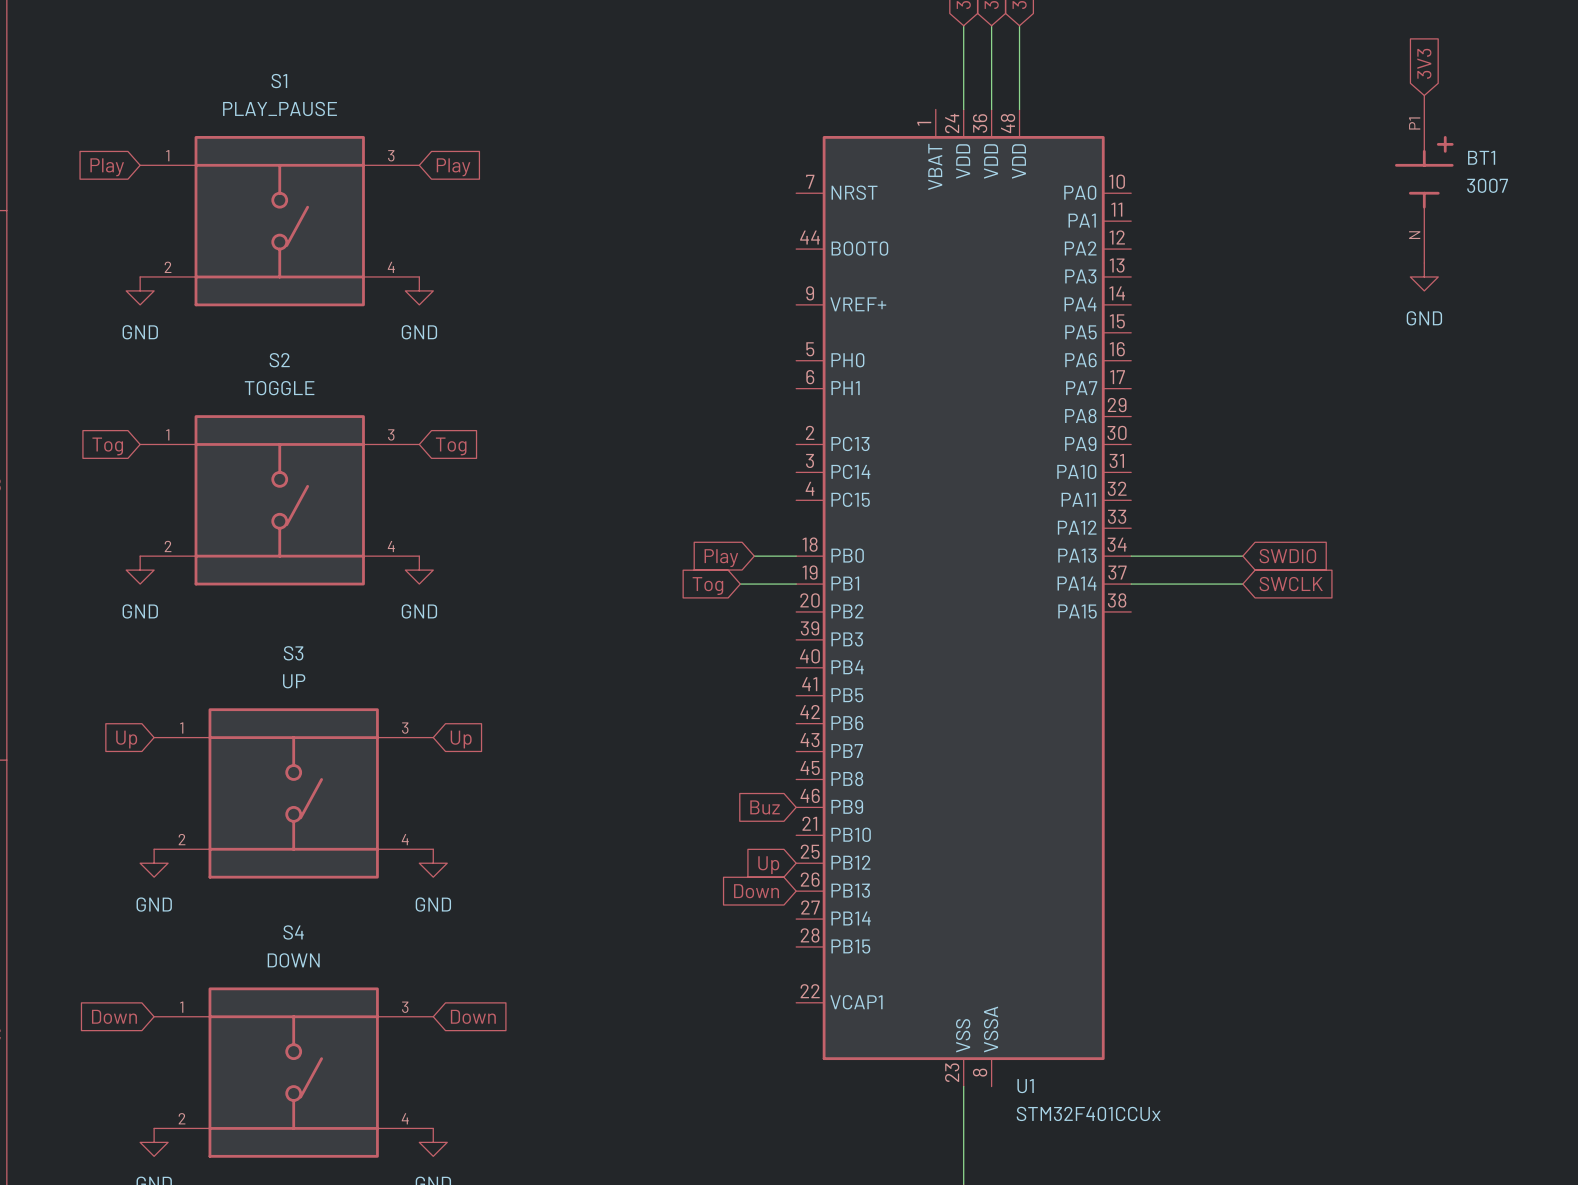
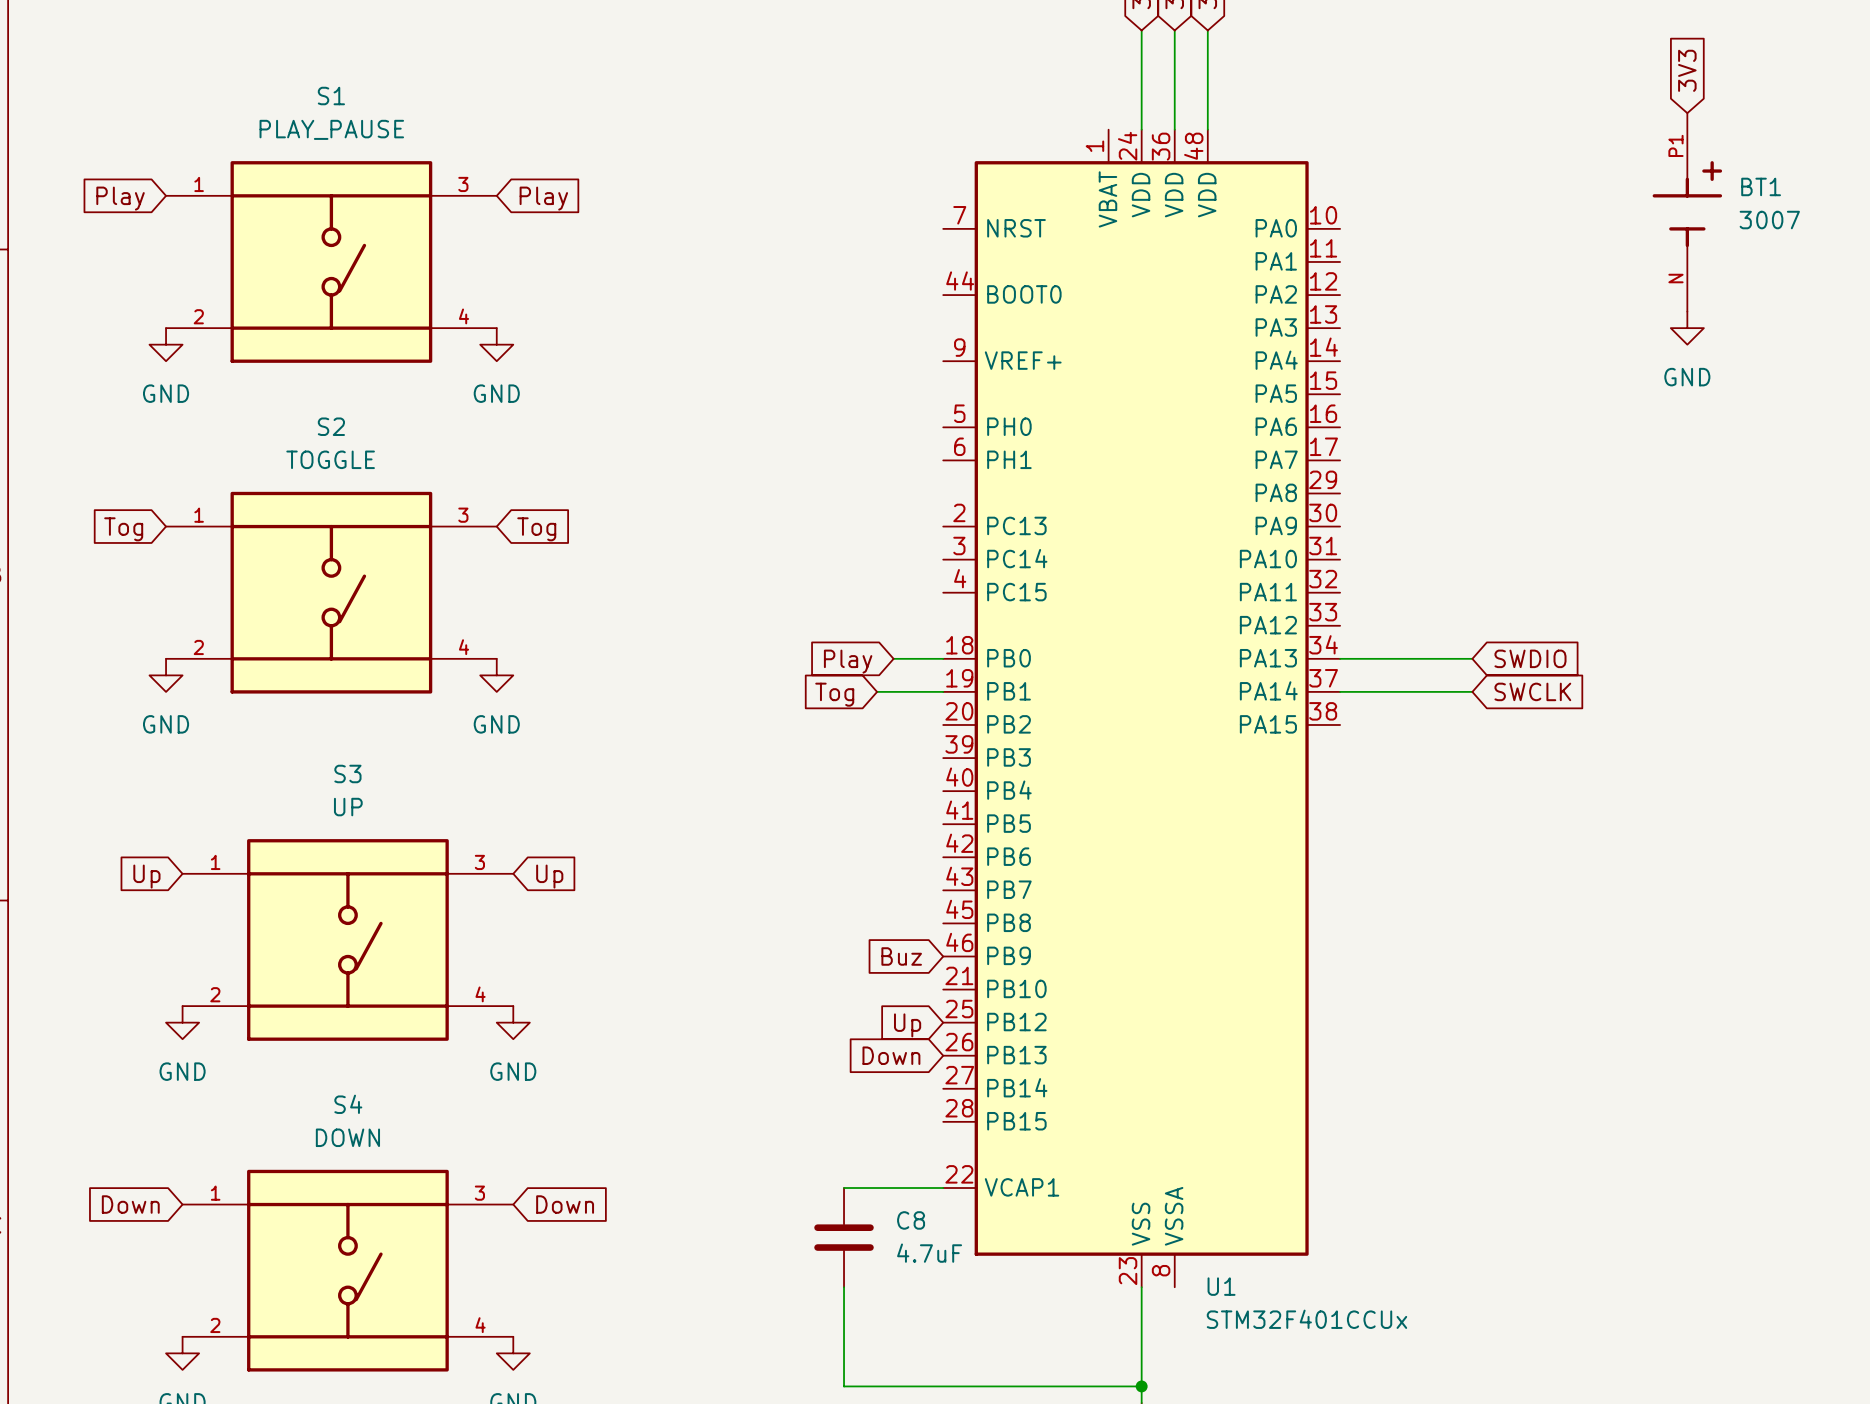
wire: none -> (844, 1188) (943, 1188)
C8: none -> 4.7uF (844, 1237)
wire: none -> (844, 1287) (844, 1386) (1141, 1386)
junction: none -> (1141, 1386)

